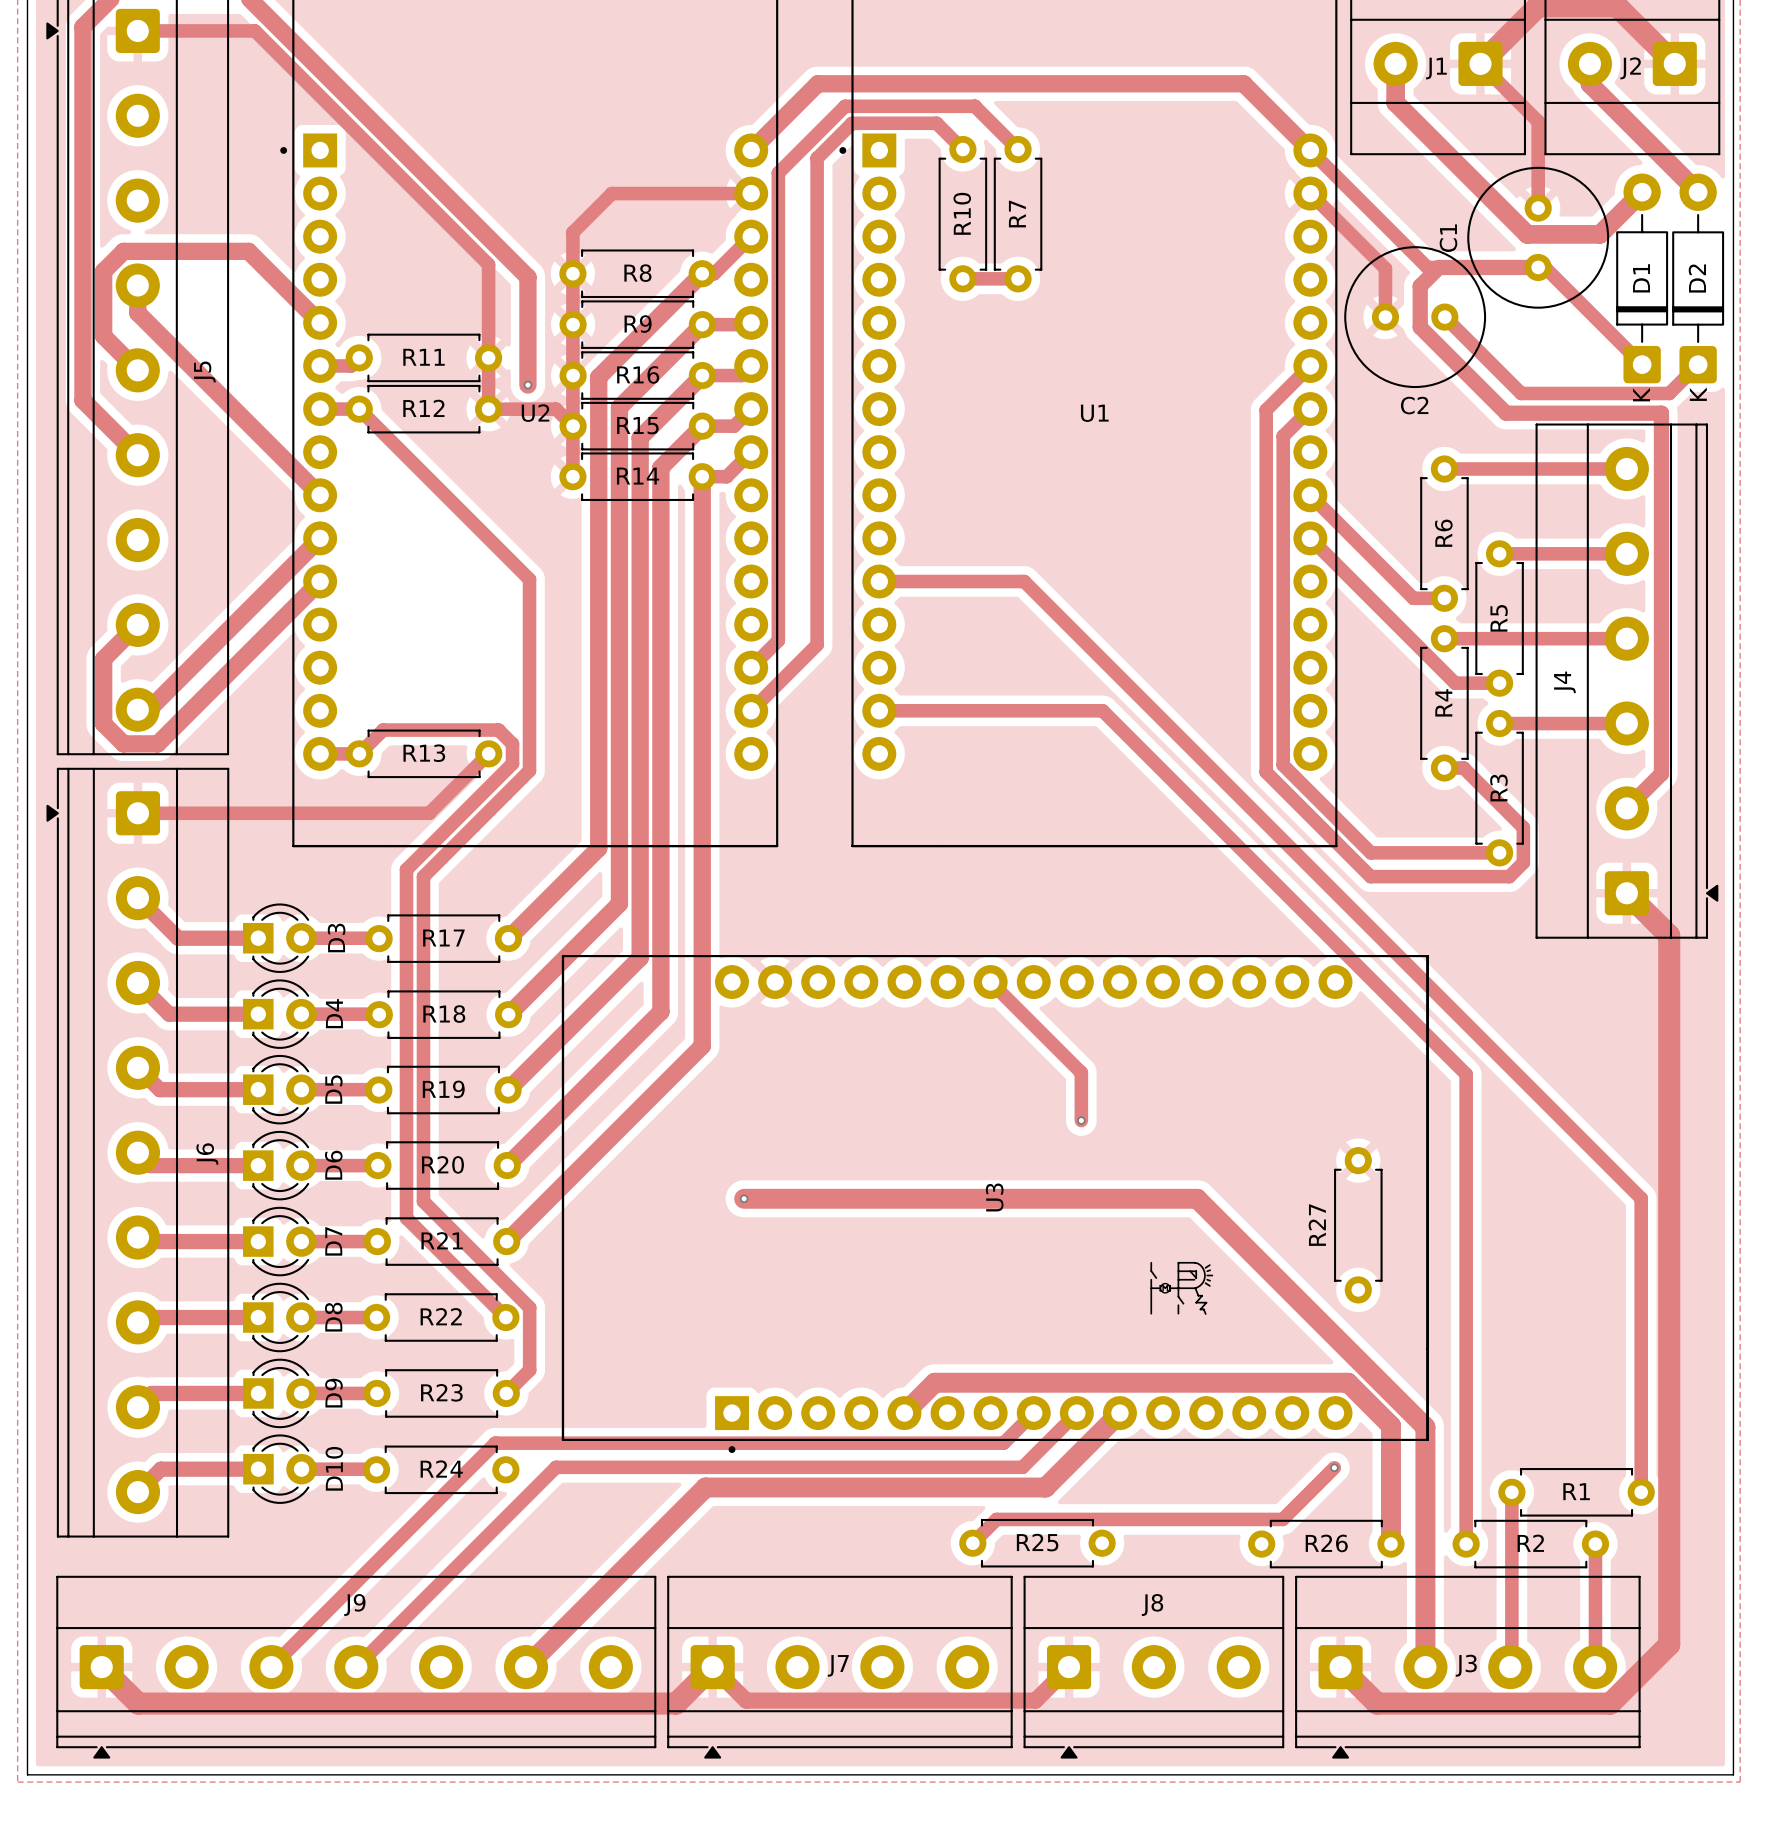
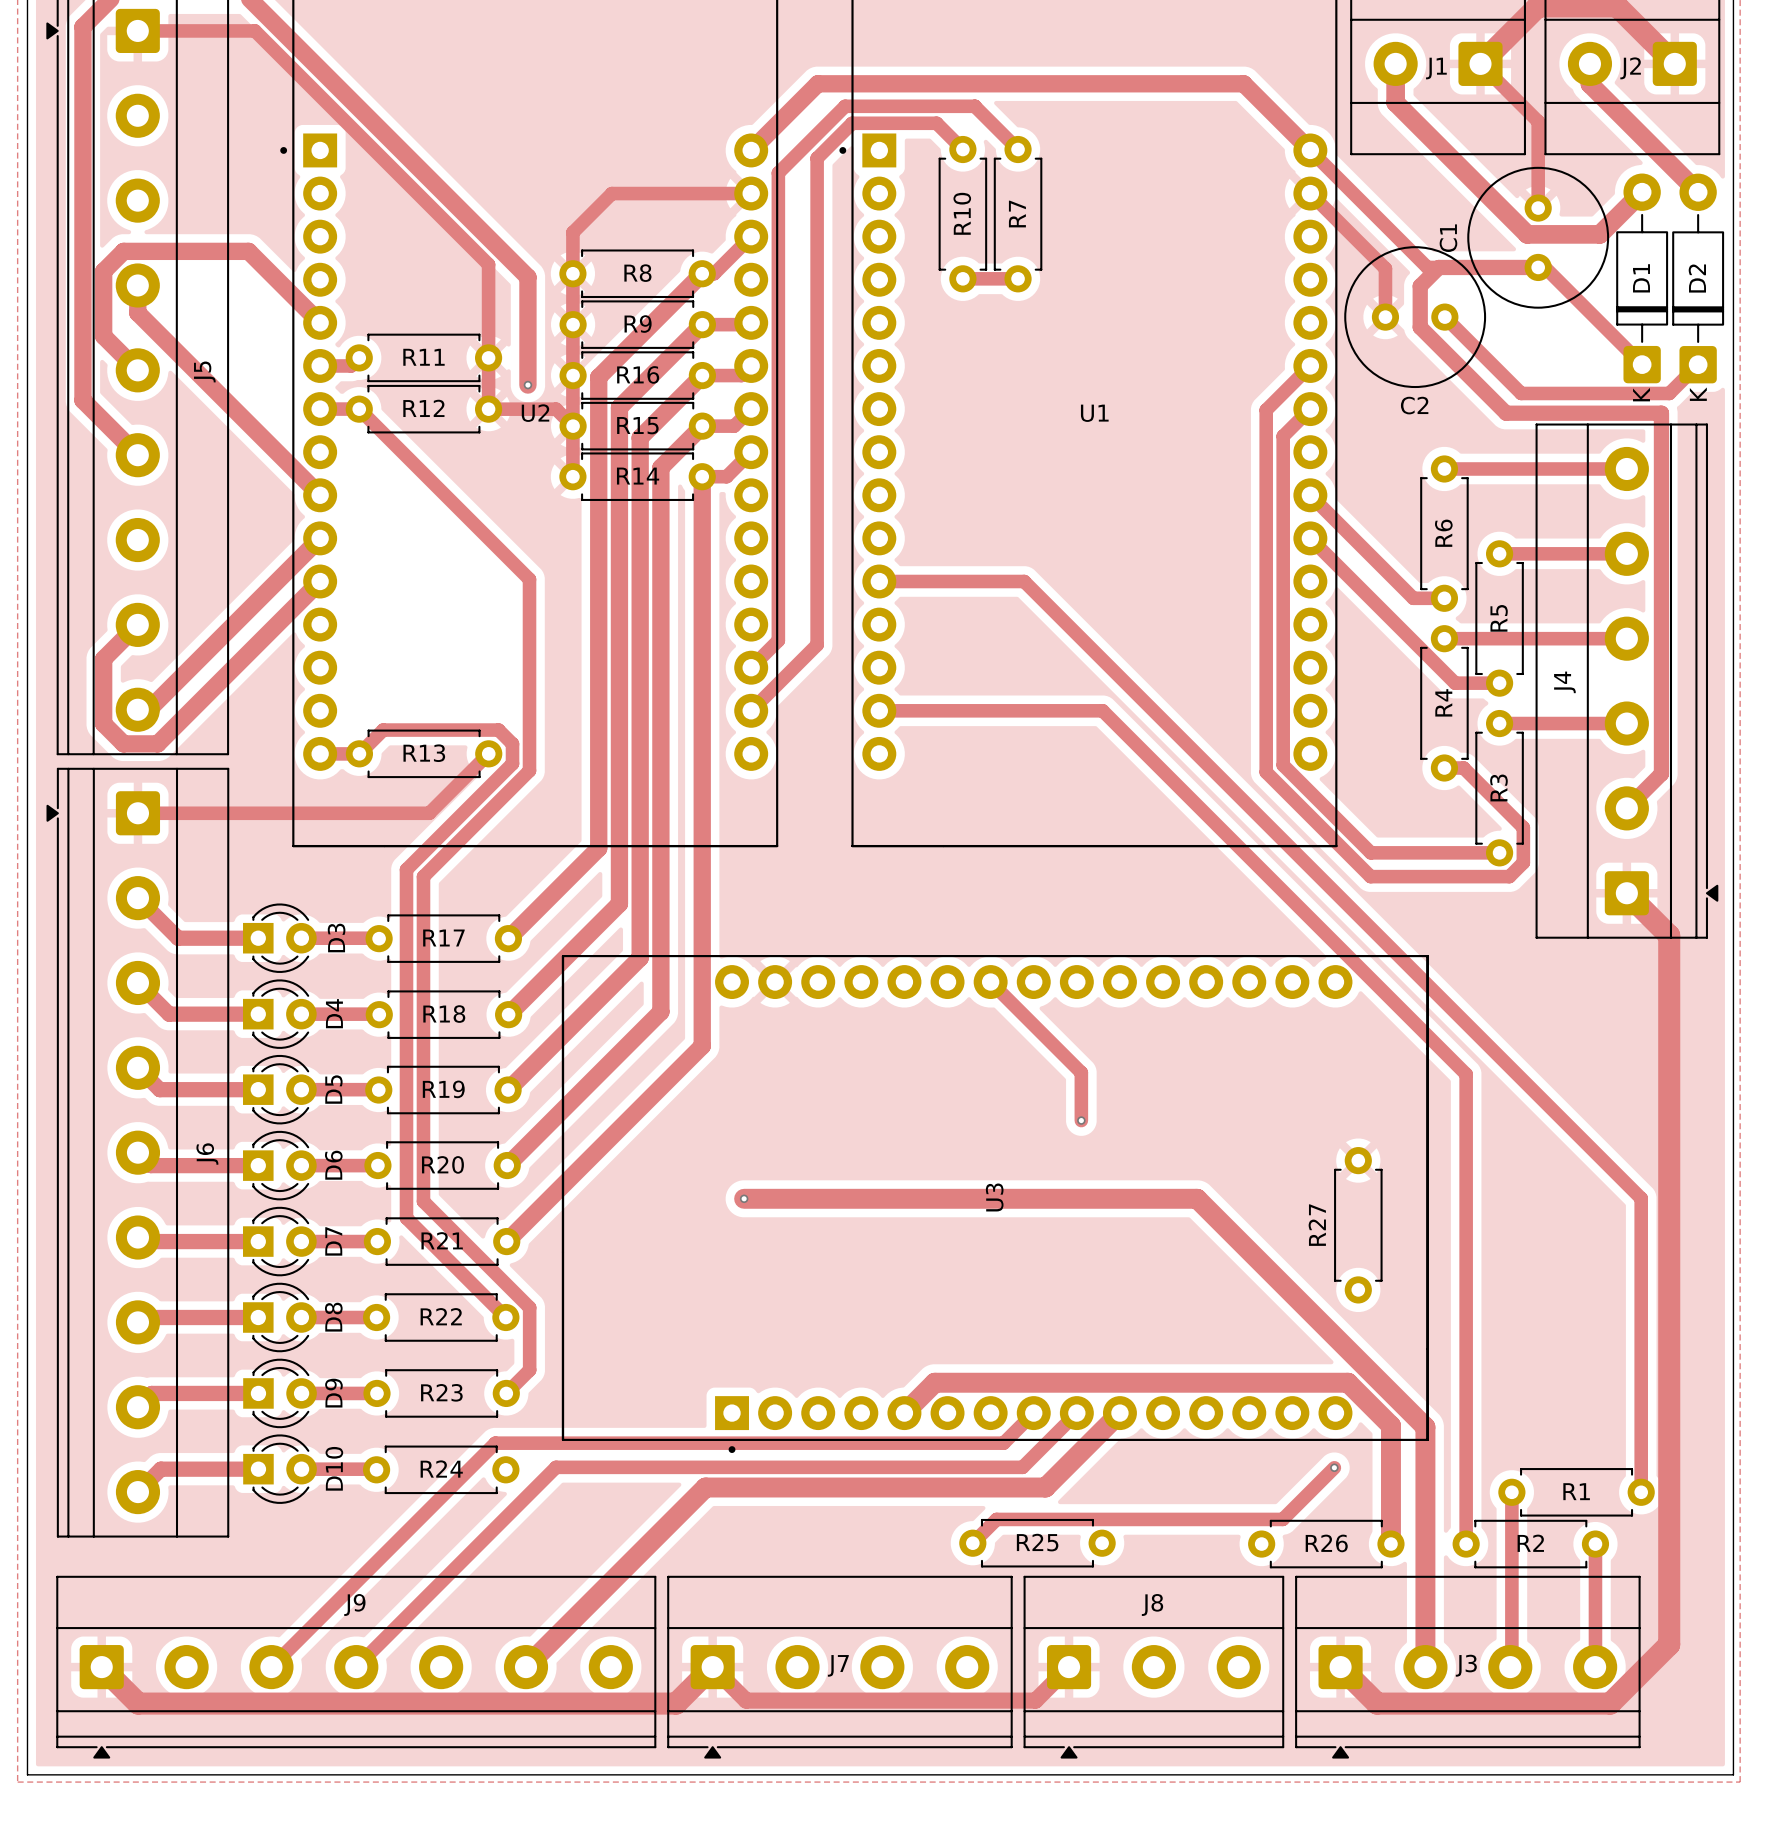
line: (1151, 1262) (1151, 1271) (1156, 1278) -> none
line: (1209, 1265) (1205, 1267) -> none
line: (1210, 1270) (1207, 1271) -> none
line: (1178, 1271) (1196, 1271) (1196, 1278) (1190, 1271) -> none
line: (1207, 1275) (1212, 1275) -> none
line: (1151, 1279) (1151, 1313) -> none
line: (1178, 1279) (1194, 1279) -> none
line: (1207, 1279) (1210, 1280) -> none
drawing: [1160, 1283, 1171, 1294] -> none
line: (1205, 1283) (1209, 1285) -> none
line: (1161, 1285) (1161, 1290) -> none
line: (1169, 1285) (1169, 1290) -> none
line: (1151, 1288) (1160, 1288) -> none
line: (1170, 1288) (1195, 1288) -> none
line: (1195, 1288) (1198, 1295) (1202, 1295) (1196, 1302) (1206, 1302) (1200, 1309) (1203, 1309) (1205, 1314) -> none
line: (1195, 1288) (1204, 1280) (1202, 1268) (1195, 1262) (1178, 1262) (1178, 1296) (1183, 1303) -> none
line: (1163, 1290) (1163, 1285) (1165, 1288) (1167, 1285) (1167, 1290) -> none
line: (1178, 1305) (1178, 1313) -> none

